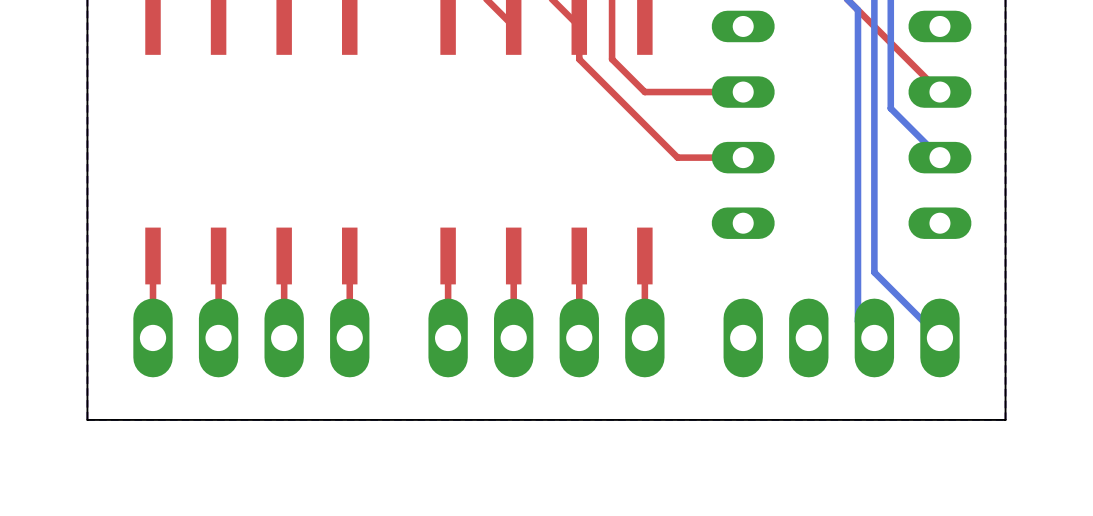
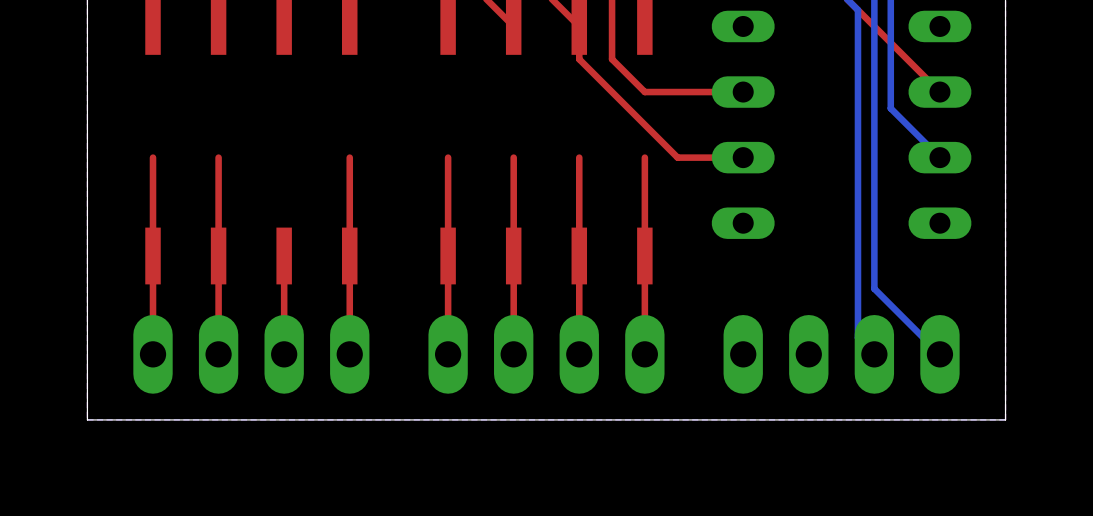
top track: none -> (153, 157) (153, 255)
top track: none -> (218, 157) (218, 255)
top track: none -> (349, 157) (349, 255)
top track: none -> (448, 157) (448, 255)
top track: none -> (513, 157) (513, 255)
top track: none -> (579, 157) (579, 255)
top track: none -> (644, 157) (644, 255)
bottom track: (874, 272) (939, 337) -> (874, 272) (874, 288) (939, 354)
part position: (251, 337) -> (251, 354)
part position: (546, 337) -> (546, 354)
part position: (841, 337) -> (841, 354)

